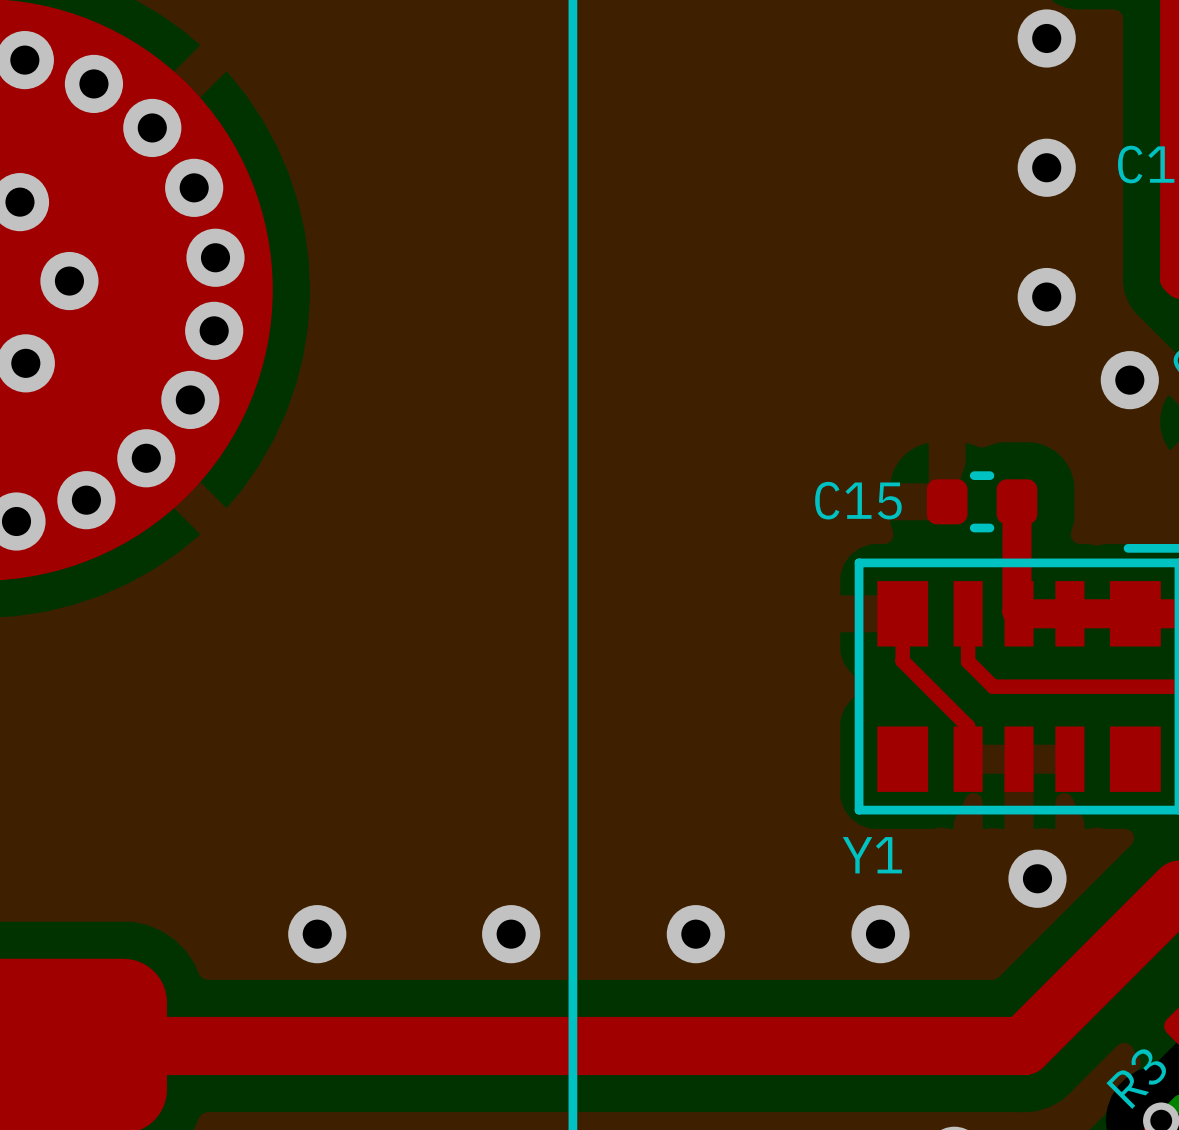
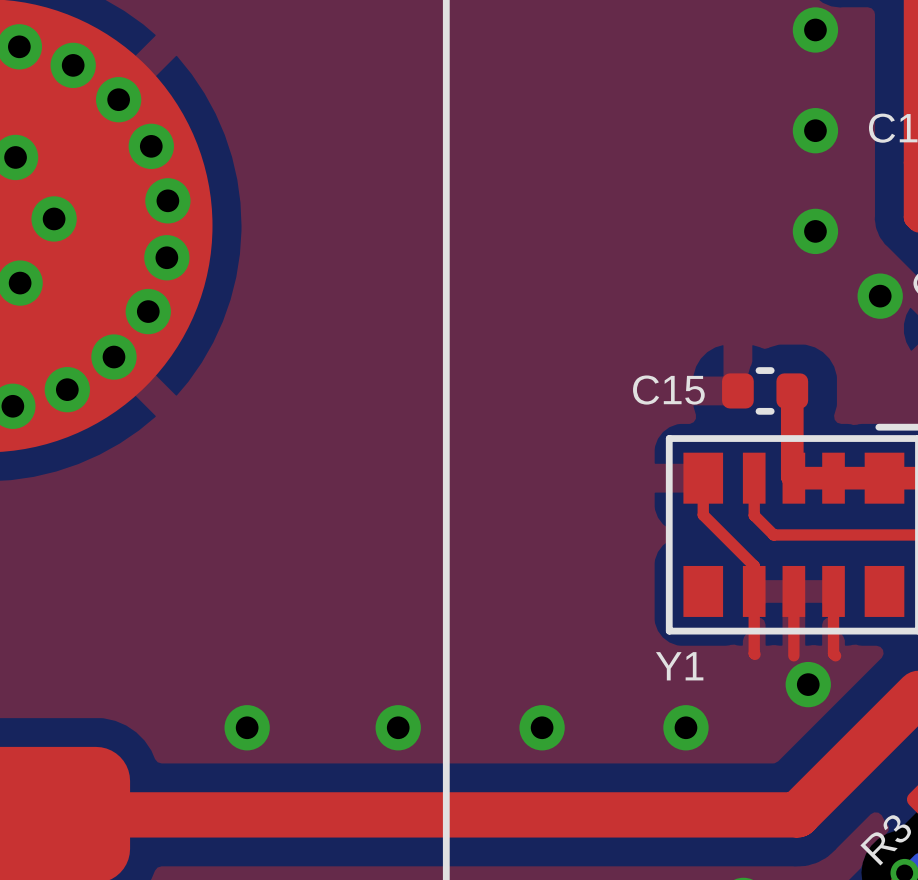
top track: none -> (754, 591) (755, 654)
top track: none -> (793, 591) (793, 655)
top track: none -> (833, 591) (833, 653) (835, 655)

